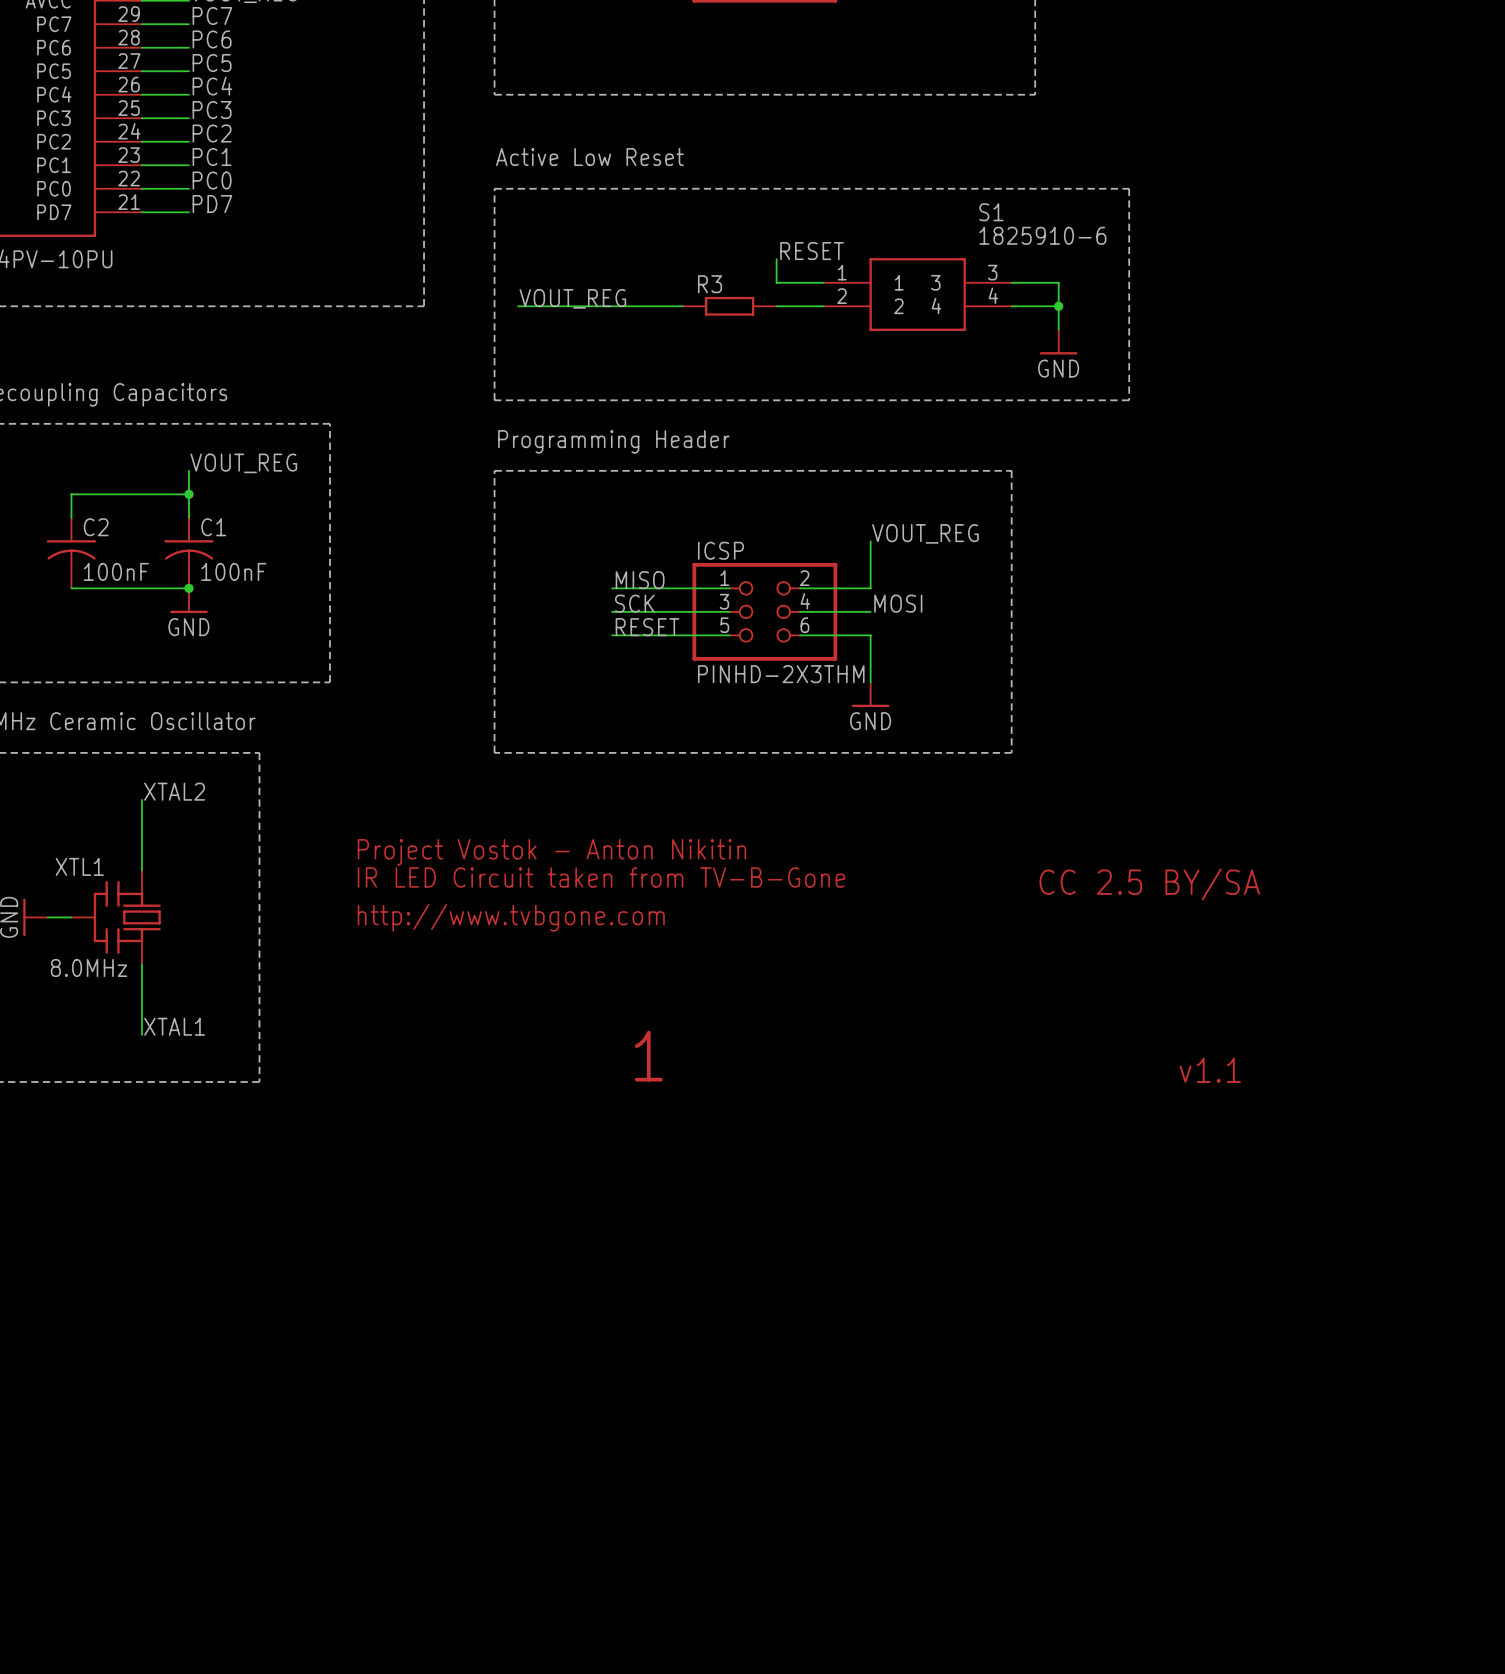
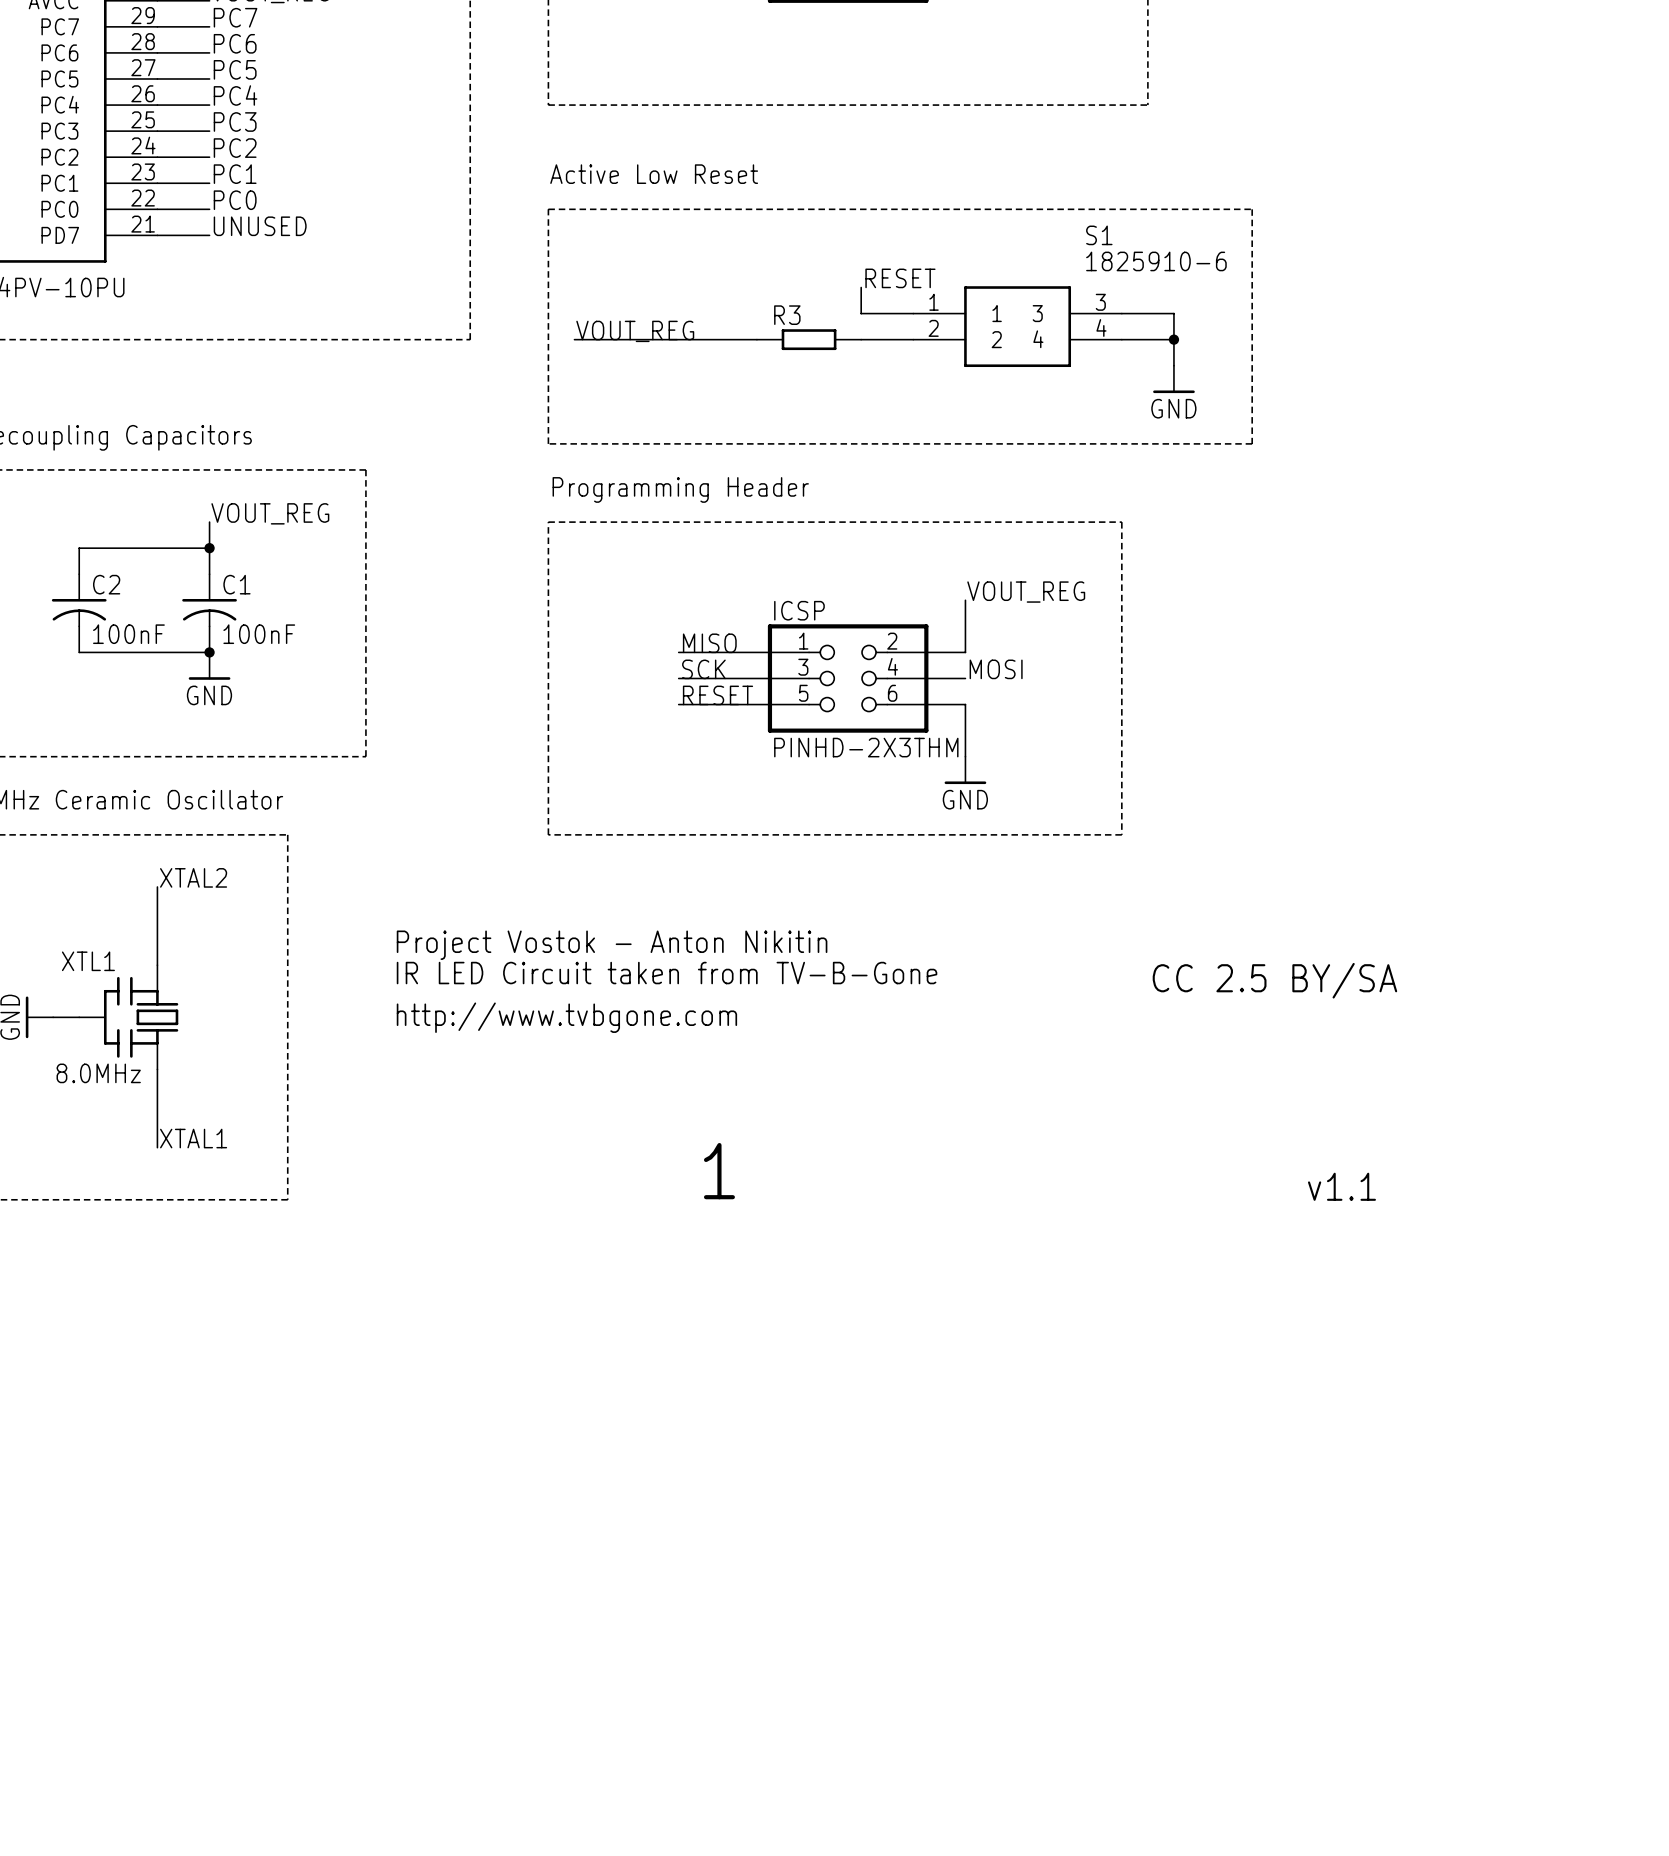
label: PD7 (212, 204) -> none
text: none -> UNUSED (260, 226)

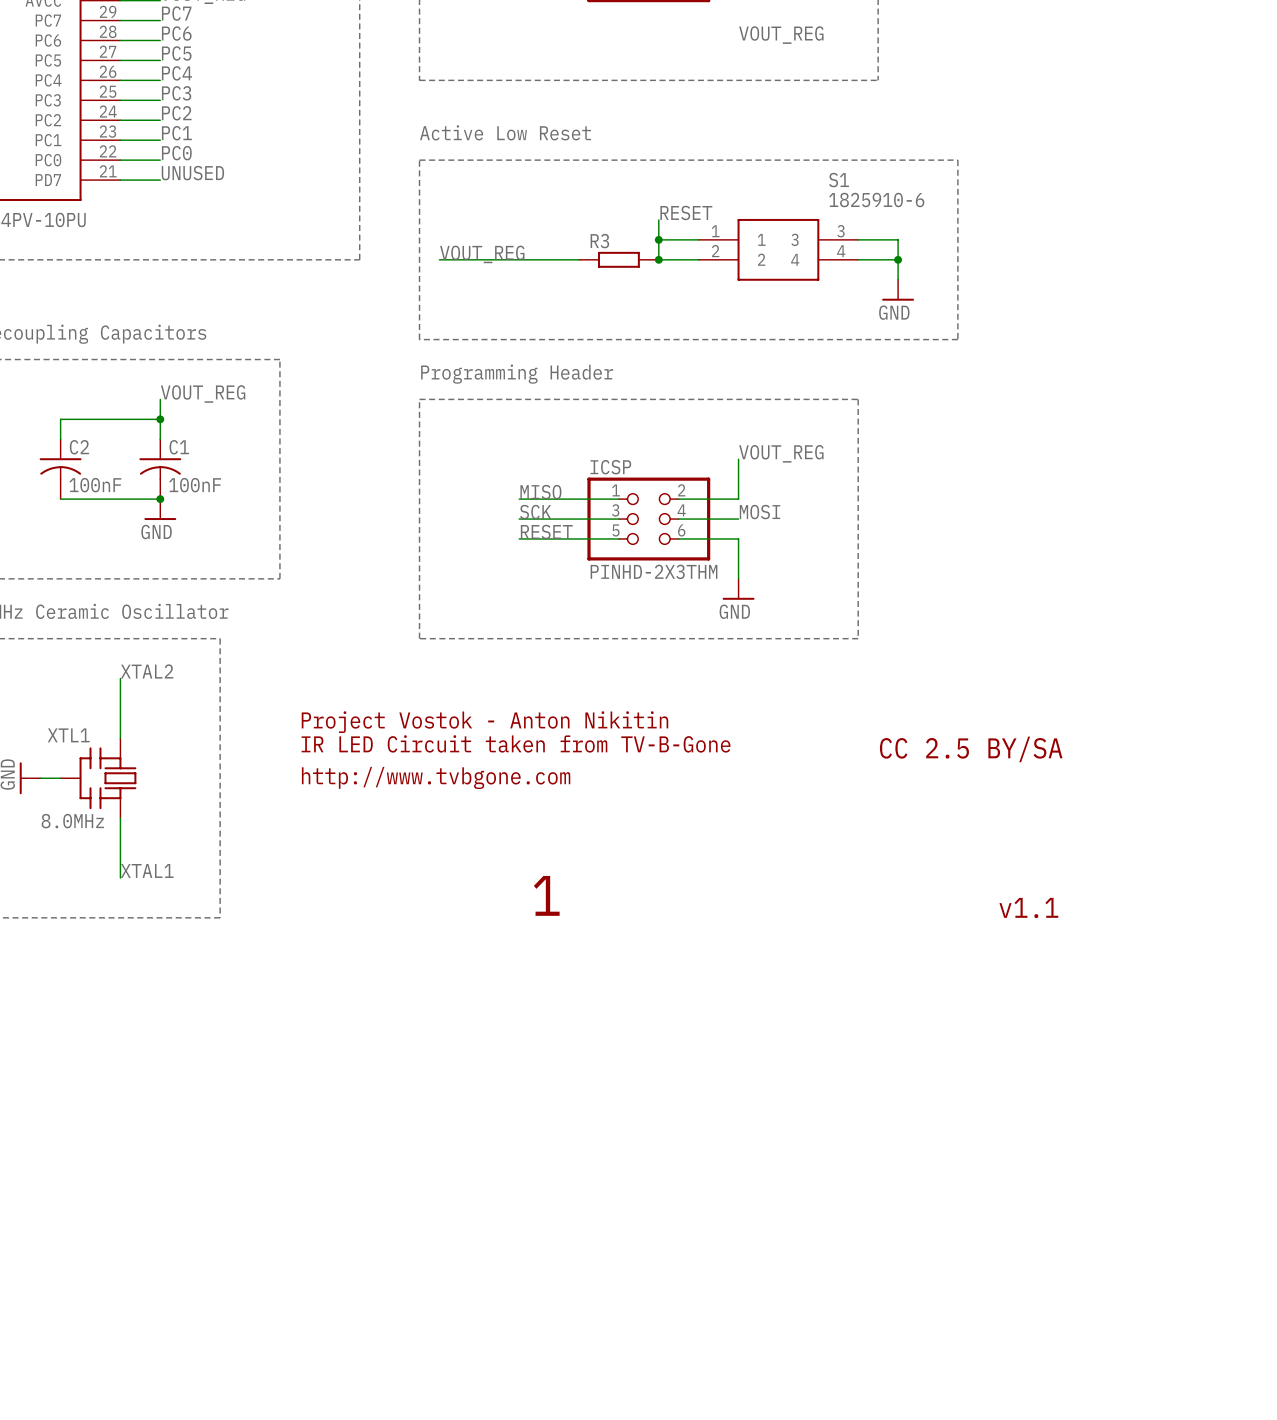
text: none -> VOUT_REG (781, 35)
wire: none -> (658, 239) (658, 259)
junction: none -> (658, 239)
junction: none -> (658, 259)

